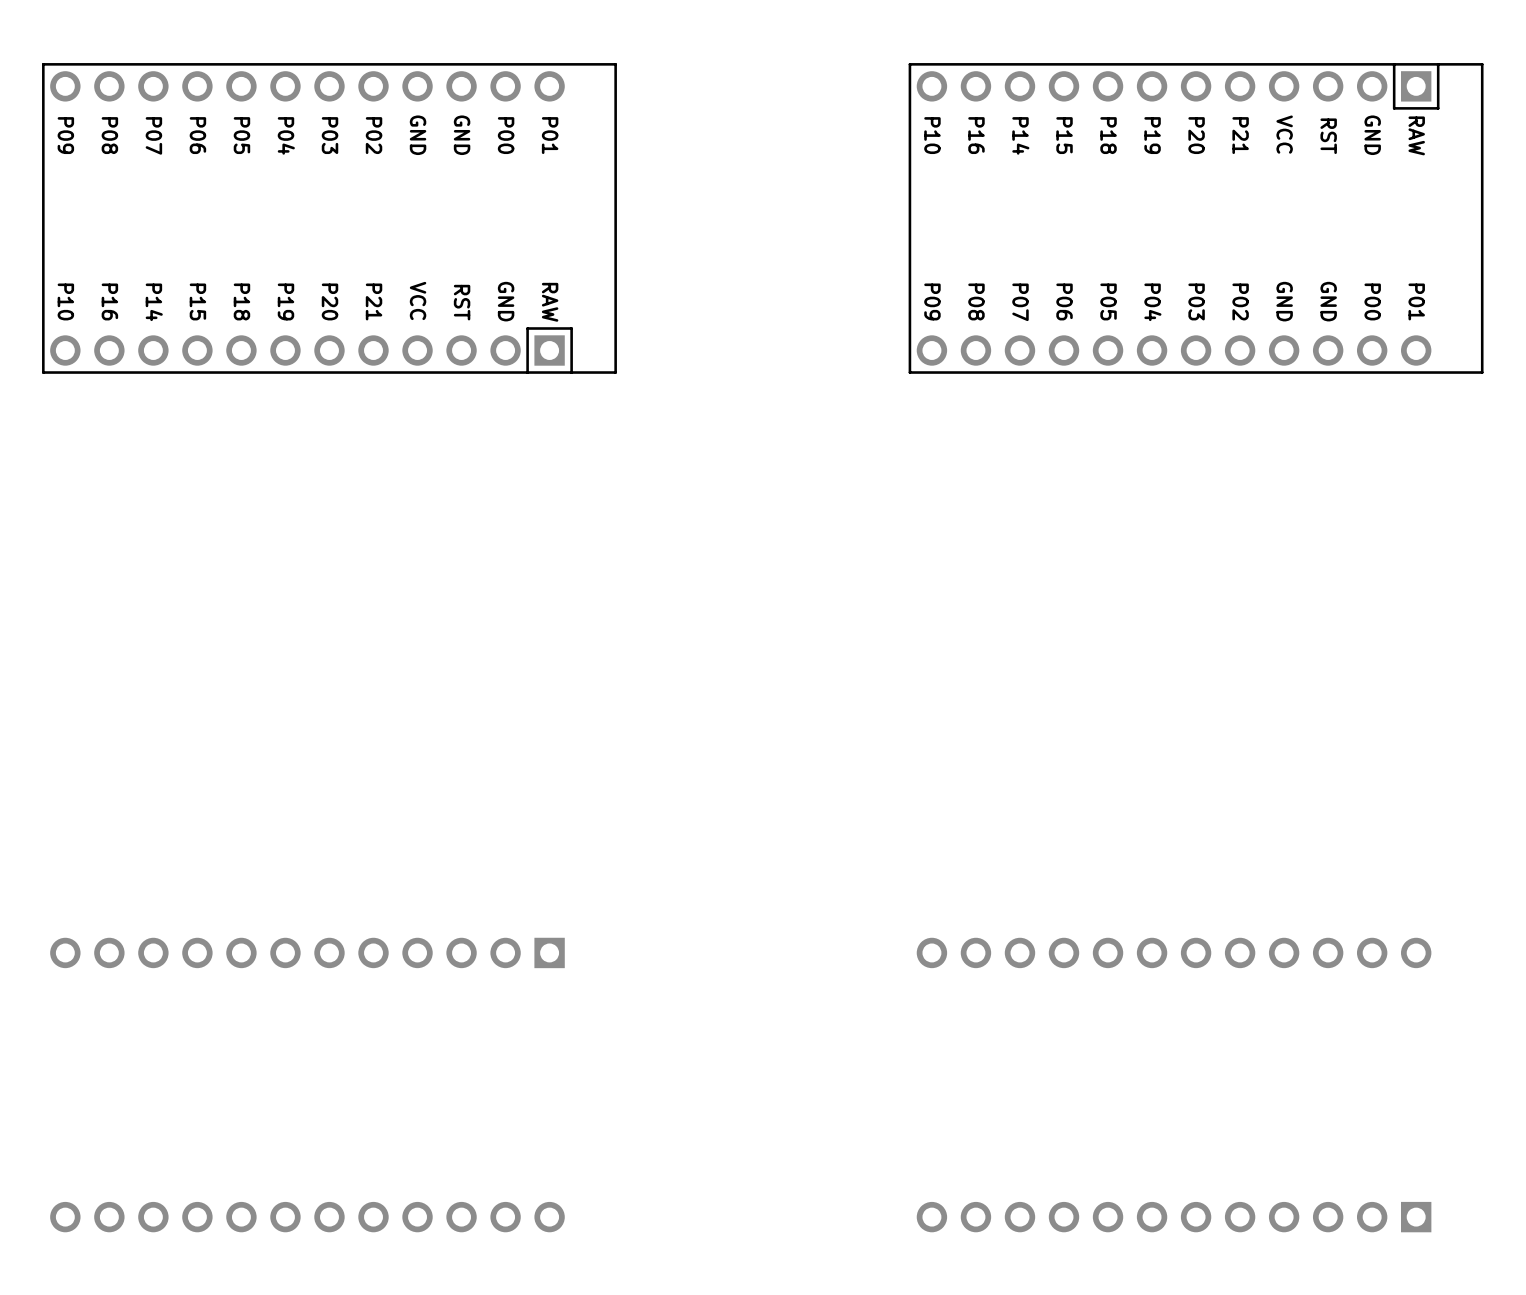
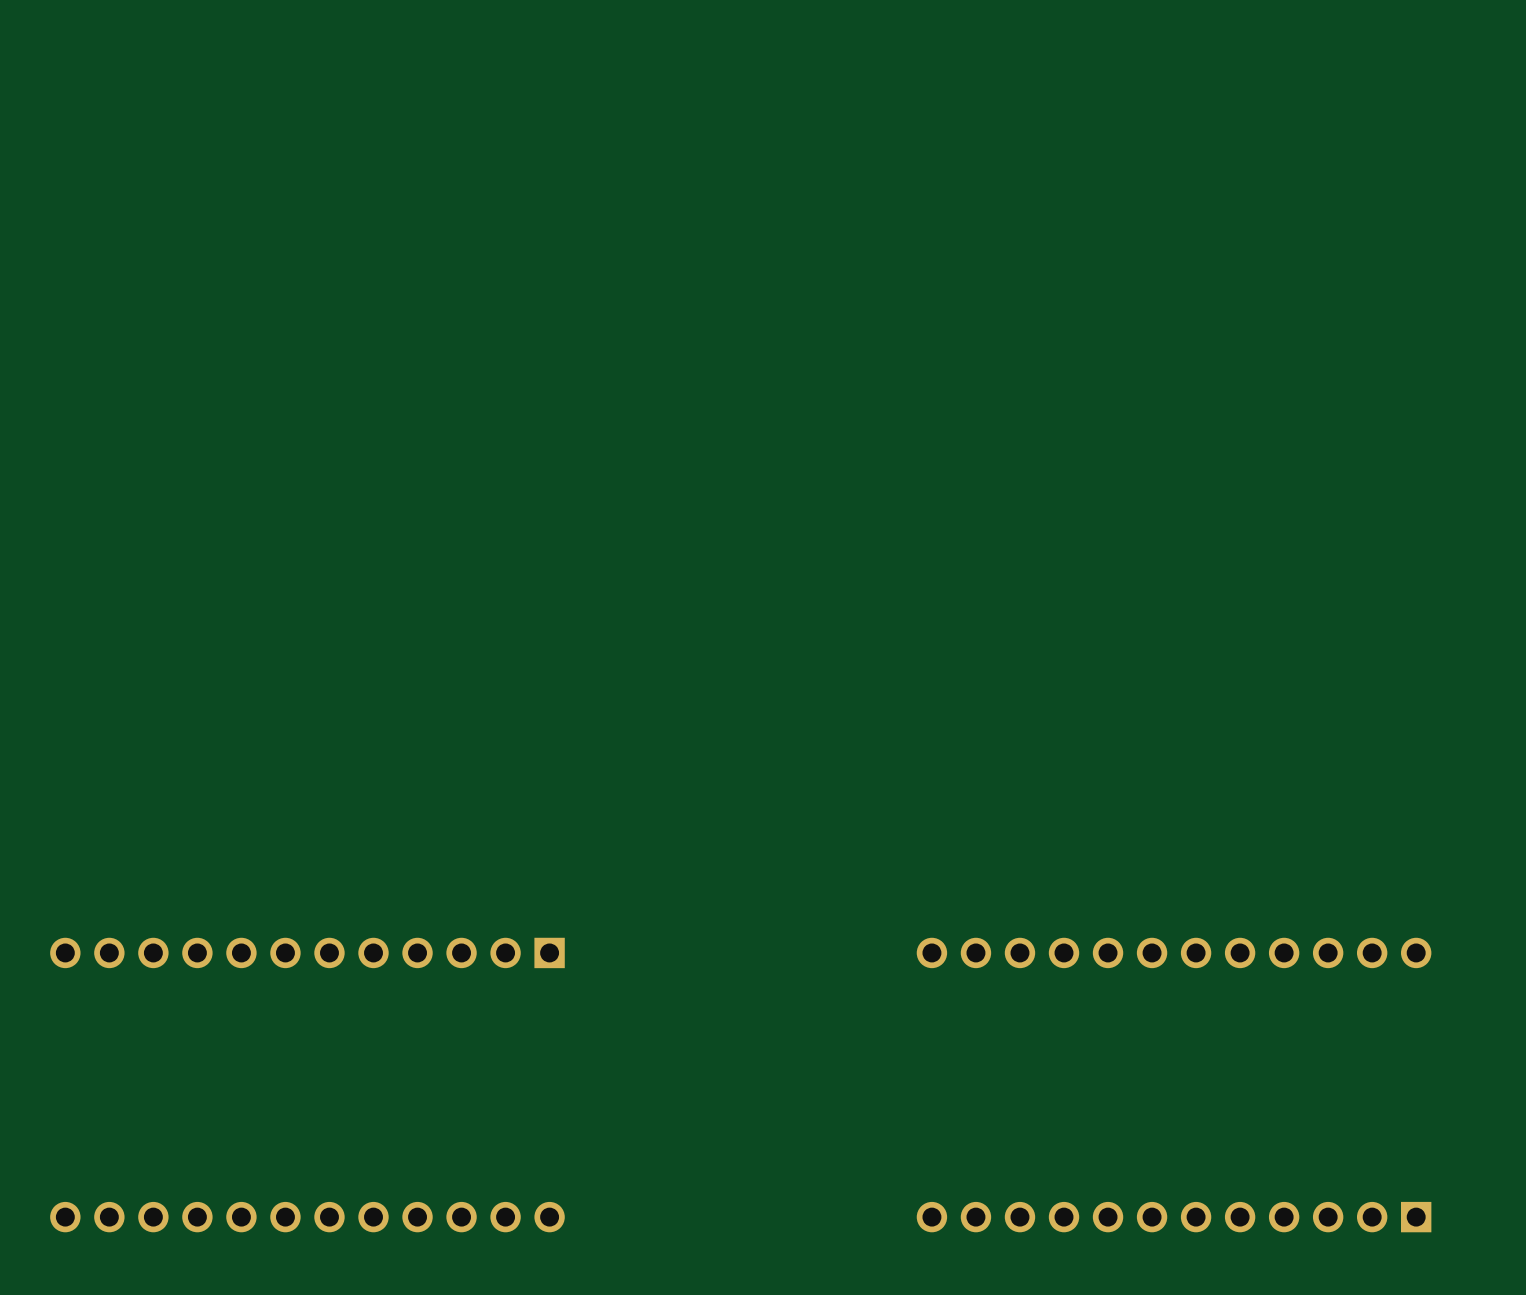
part: (329, 218) -> none
part: (1196, 218) -> none

